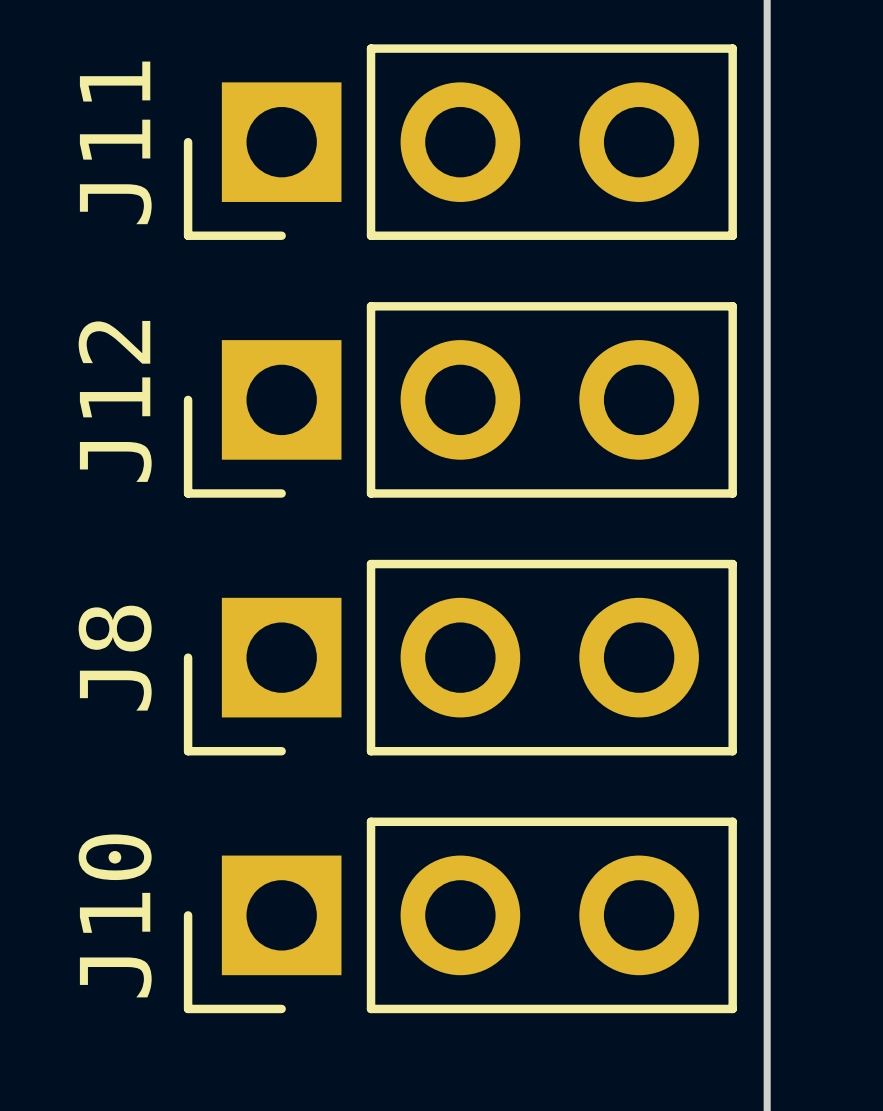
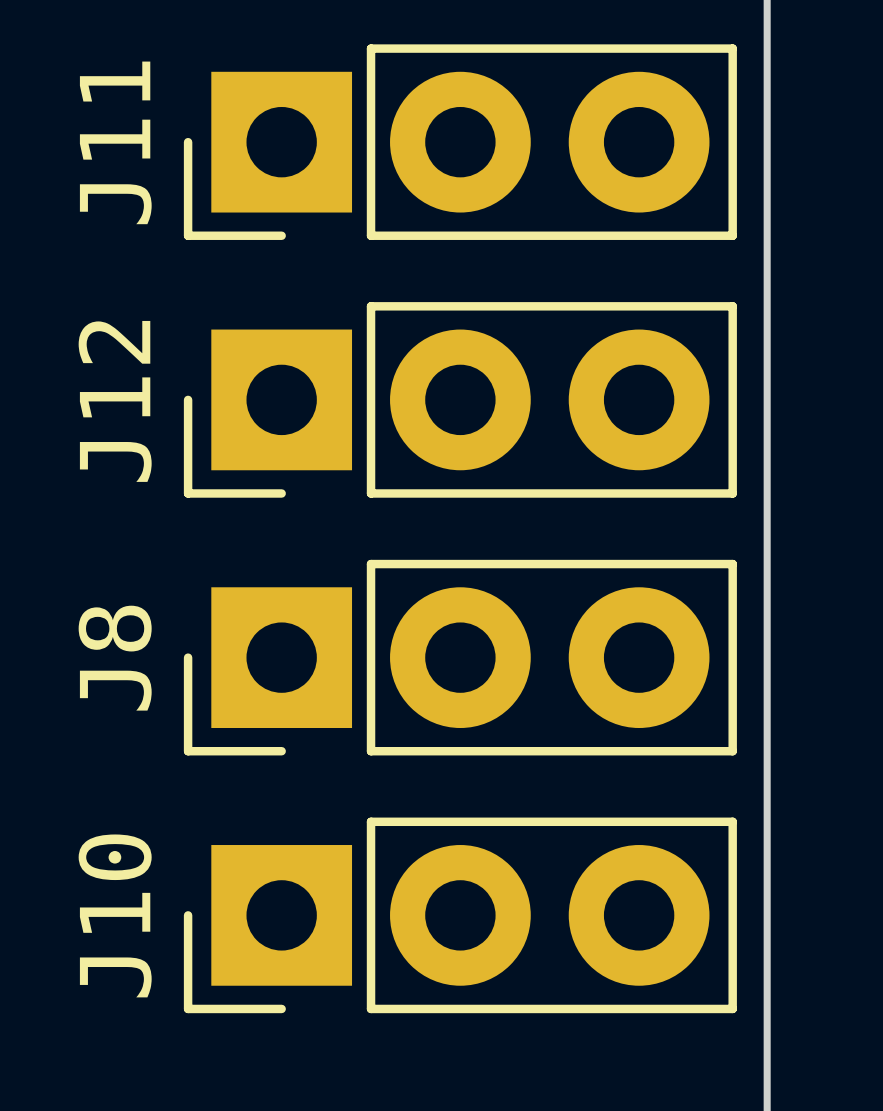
J11 footprint: [183, 44, 737, 240] -> [183, 44, 737, 240]
J12 footprint: [183, 302, 737, 498] -> [183, 302, 737, 498]
J8 footprint: [183, 559, 737, 756] -> [183, 559, 737, 756]
J10 footprint: [183, 817, 737, 1014] -> [183, 817, 737, 1014]

